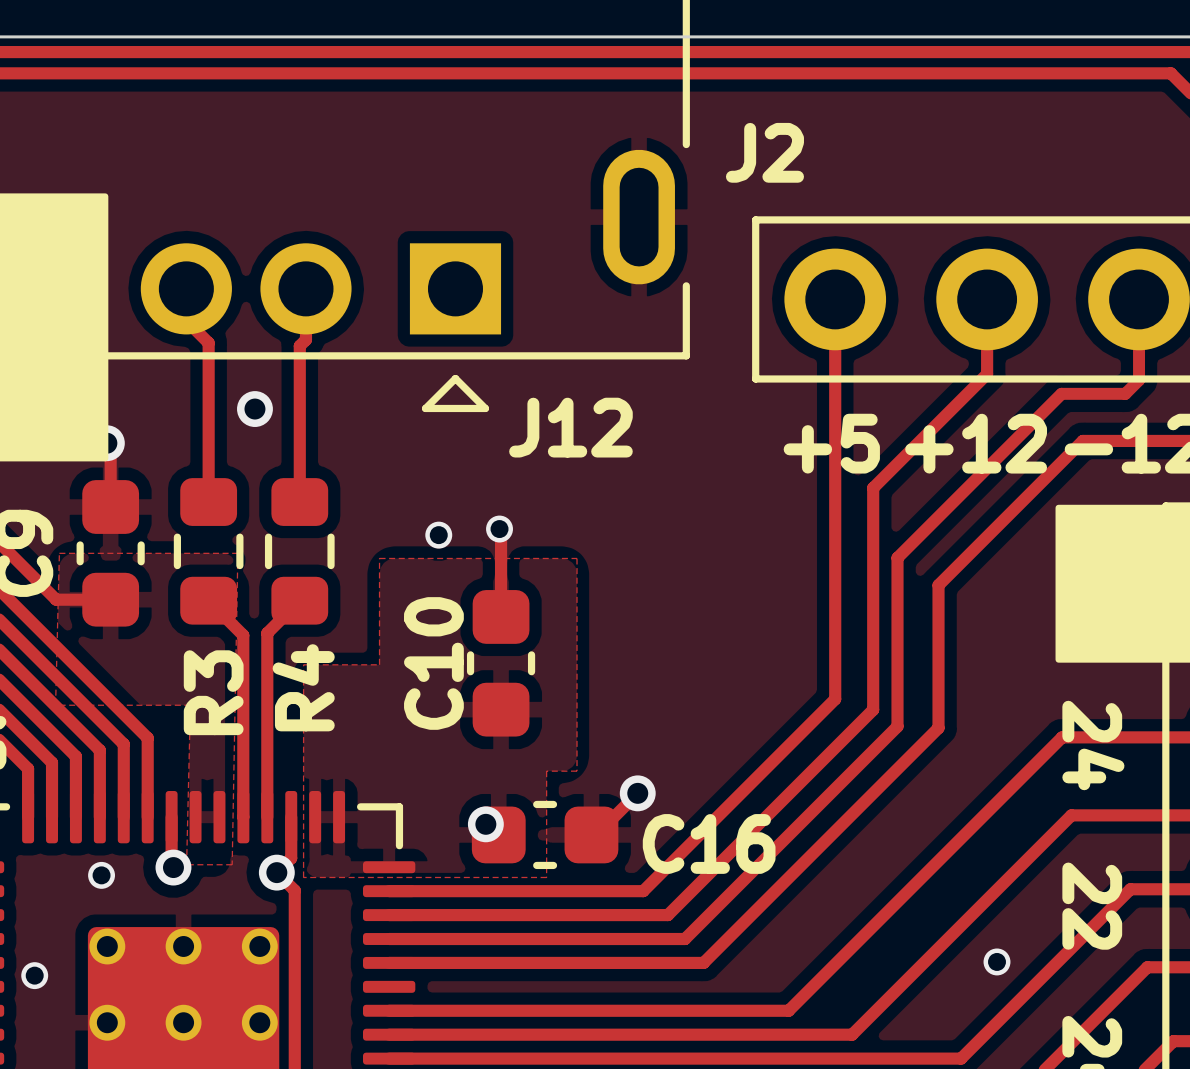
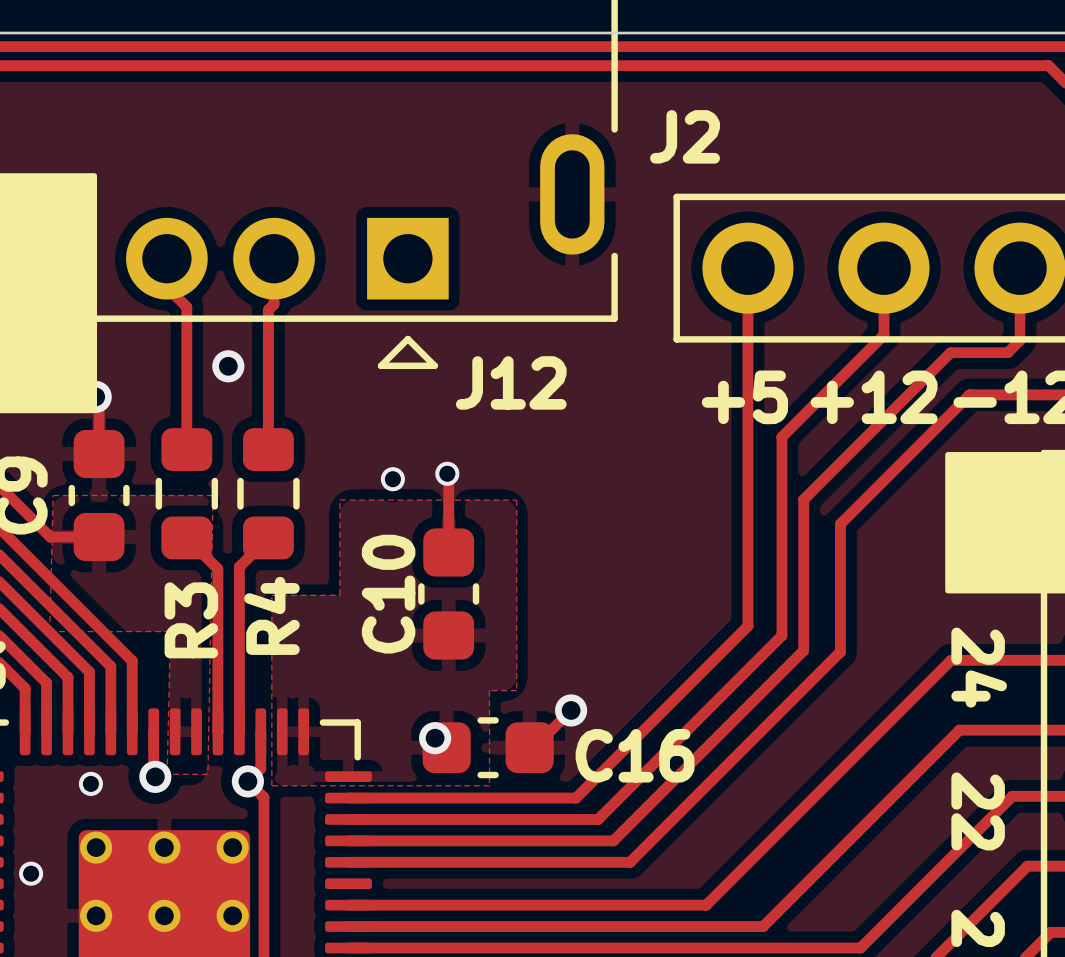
via: (997, 961) -> none

